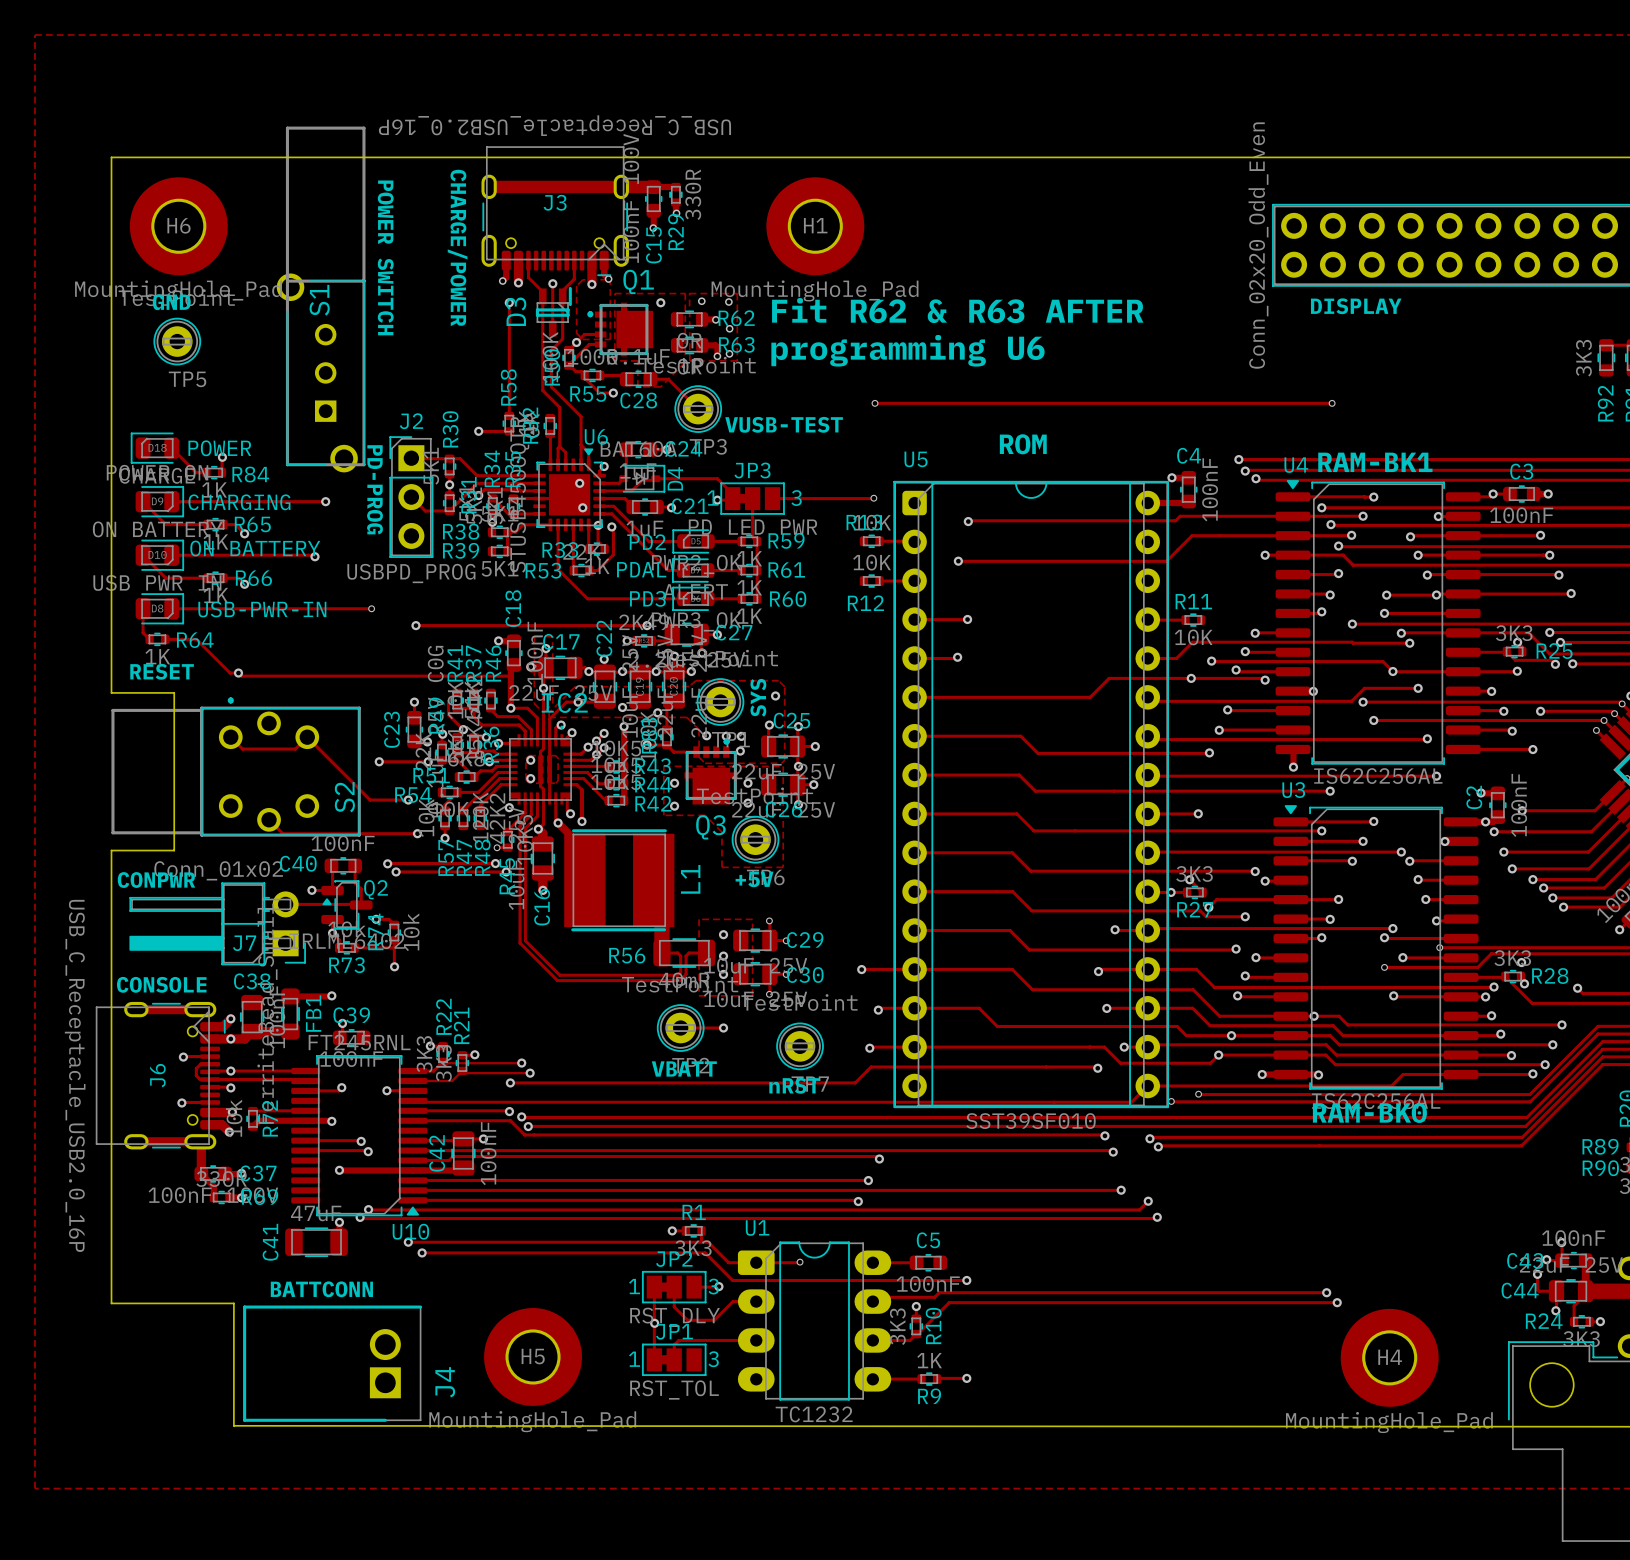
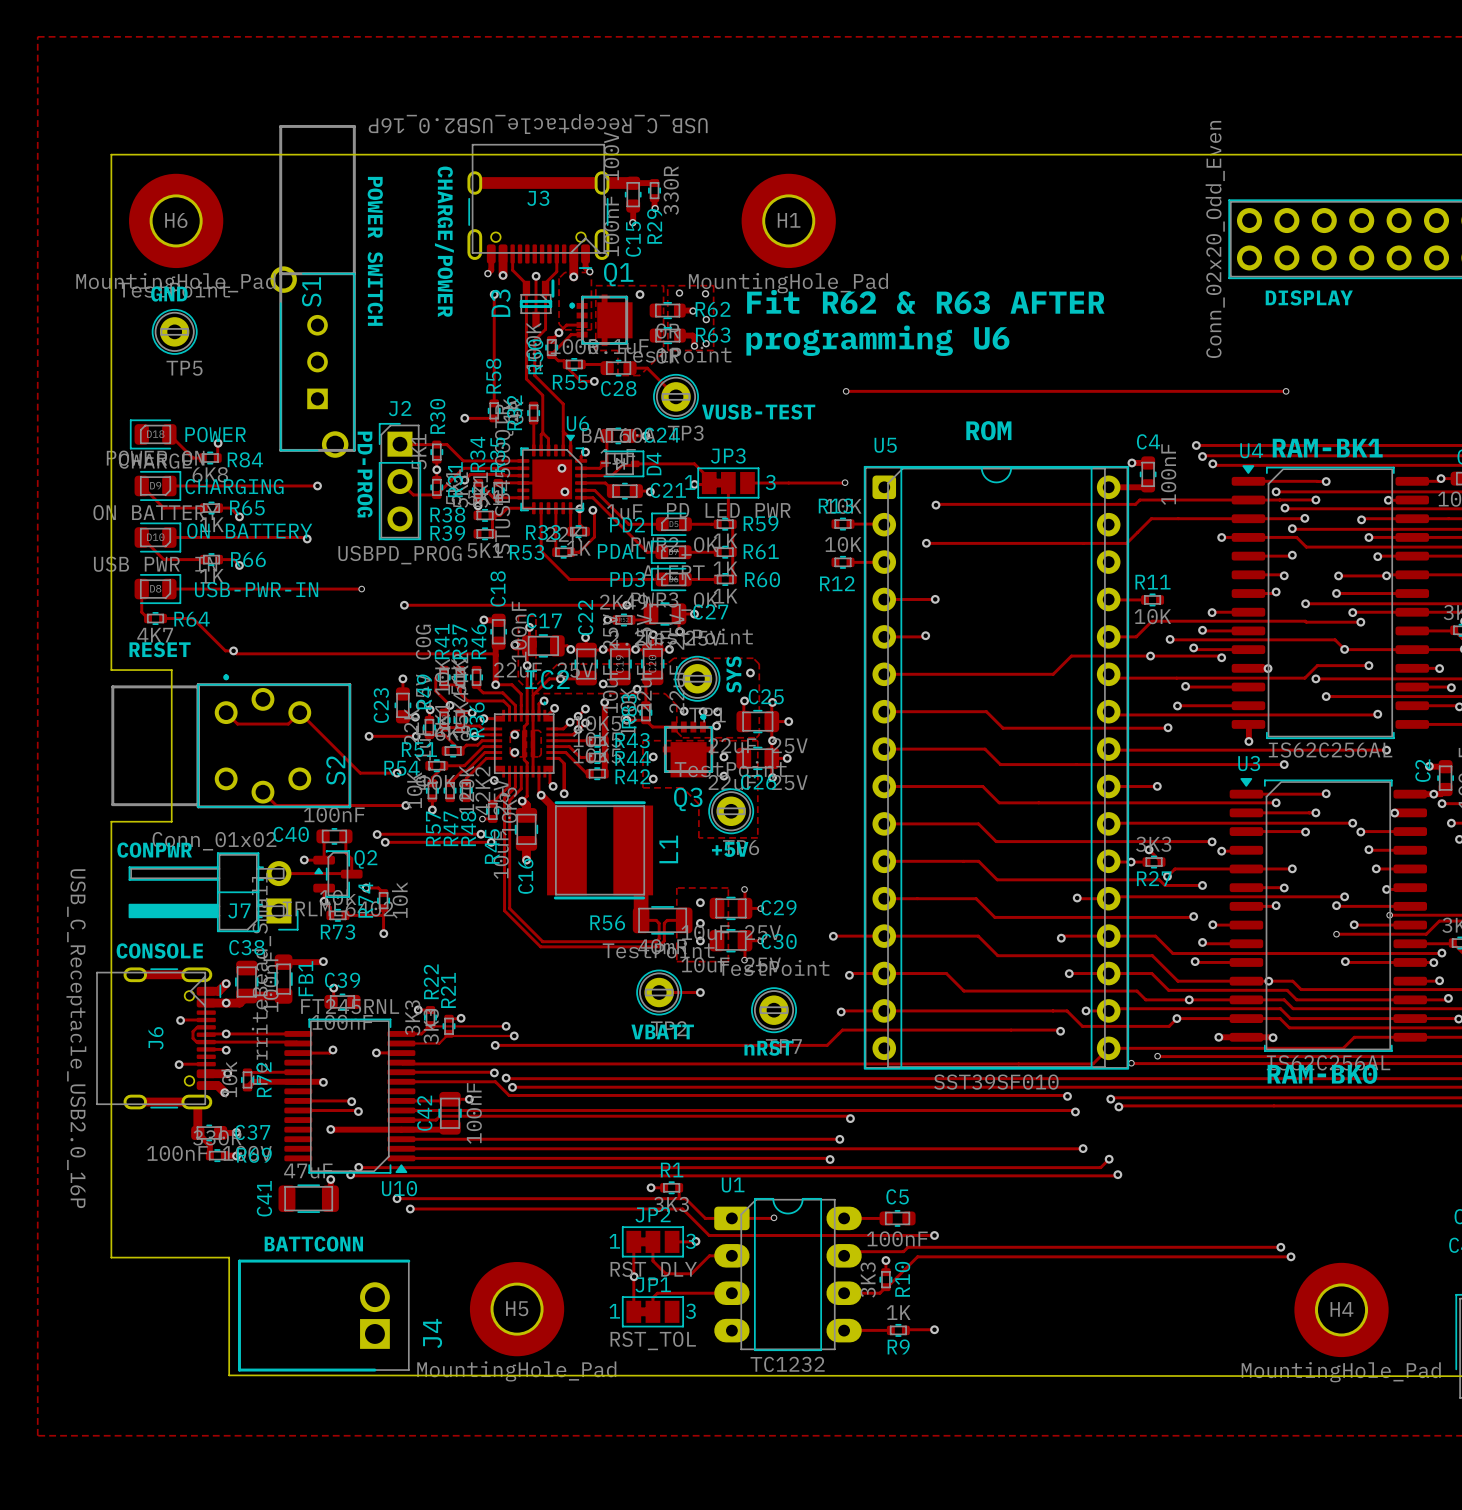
R84 value: 1K (214, 489) -> 6K8 (210, 474)
R64 value: 1K (157, 656) -> 4K7 (155, 635)

